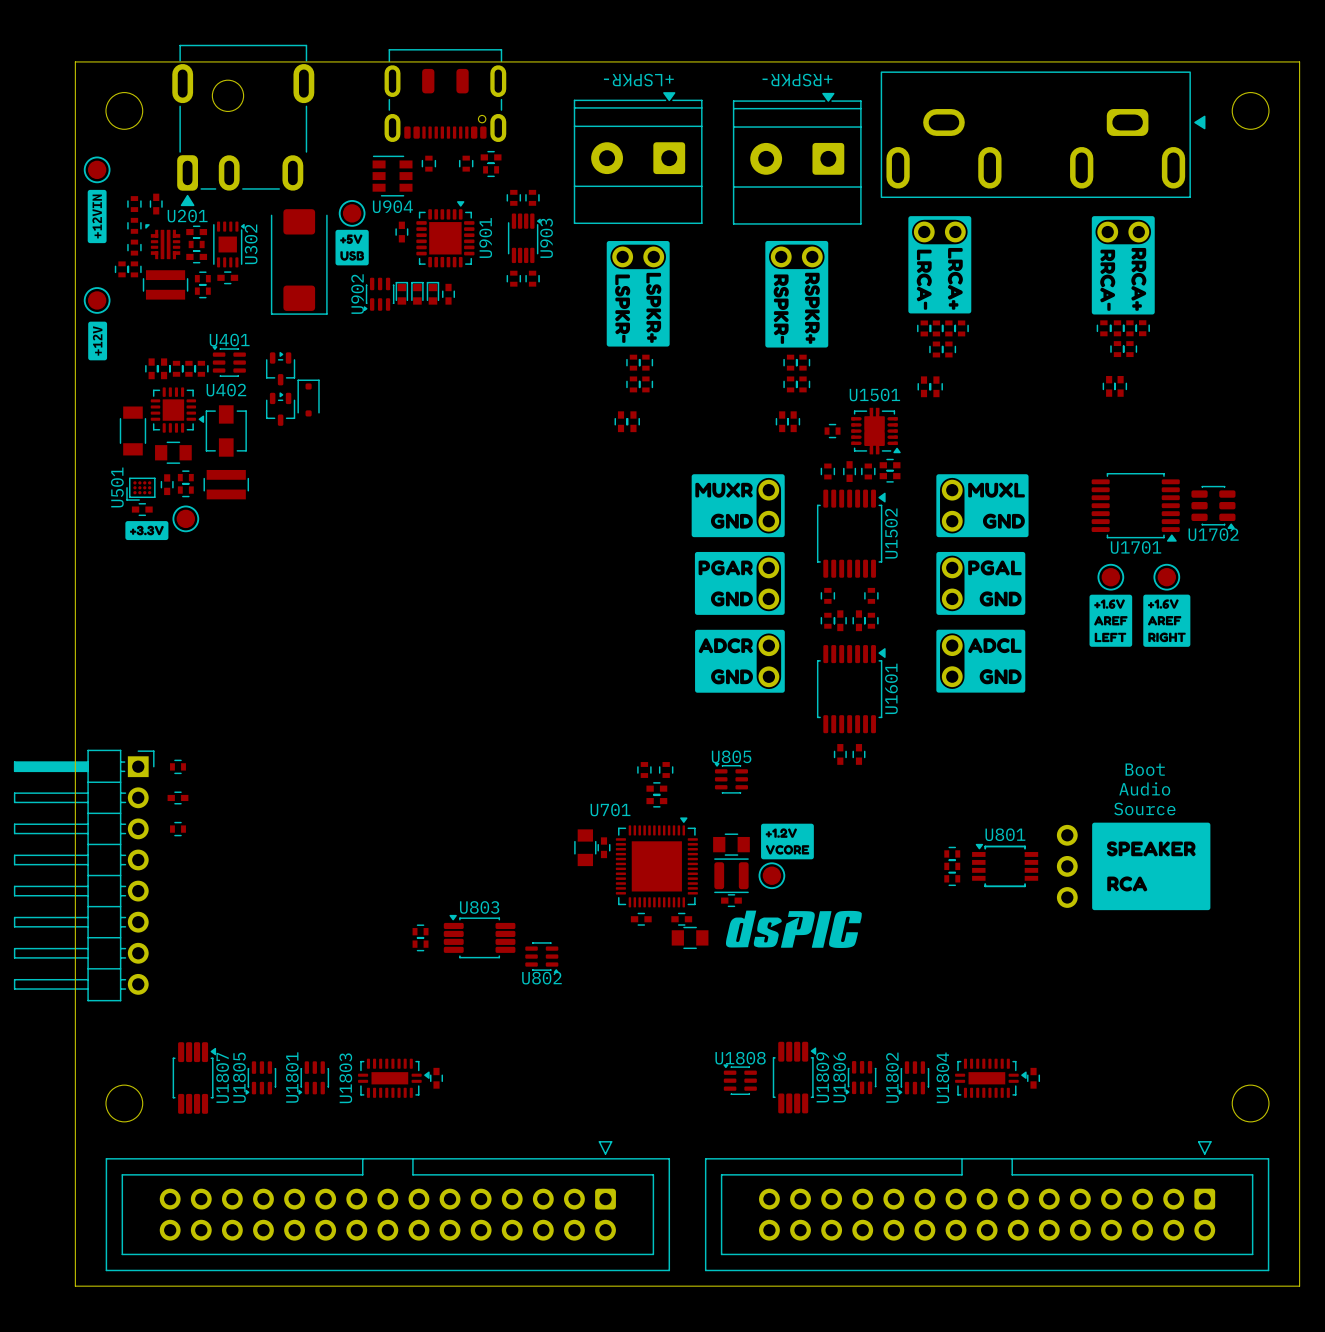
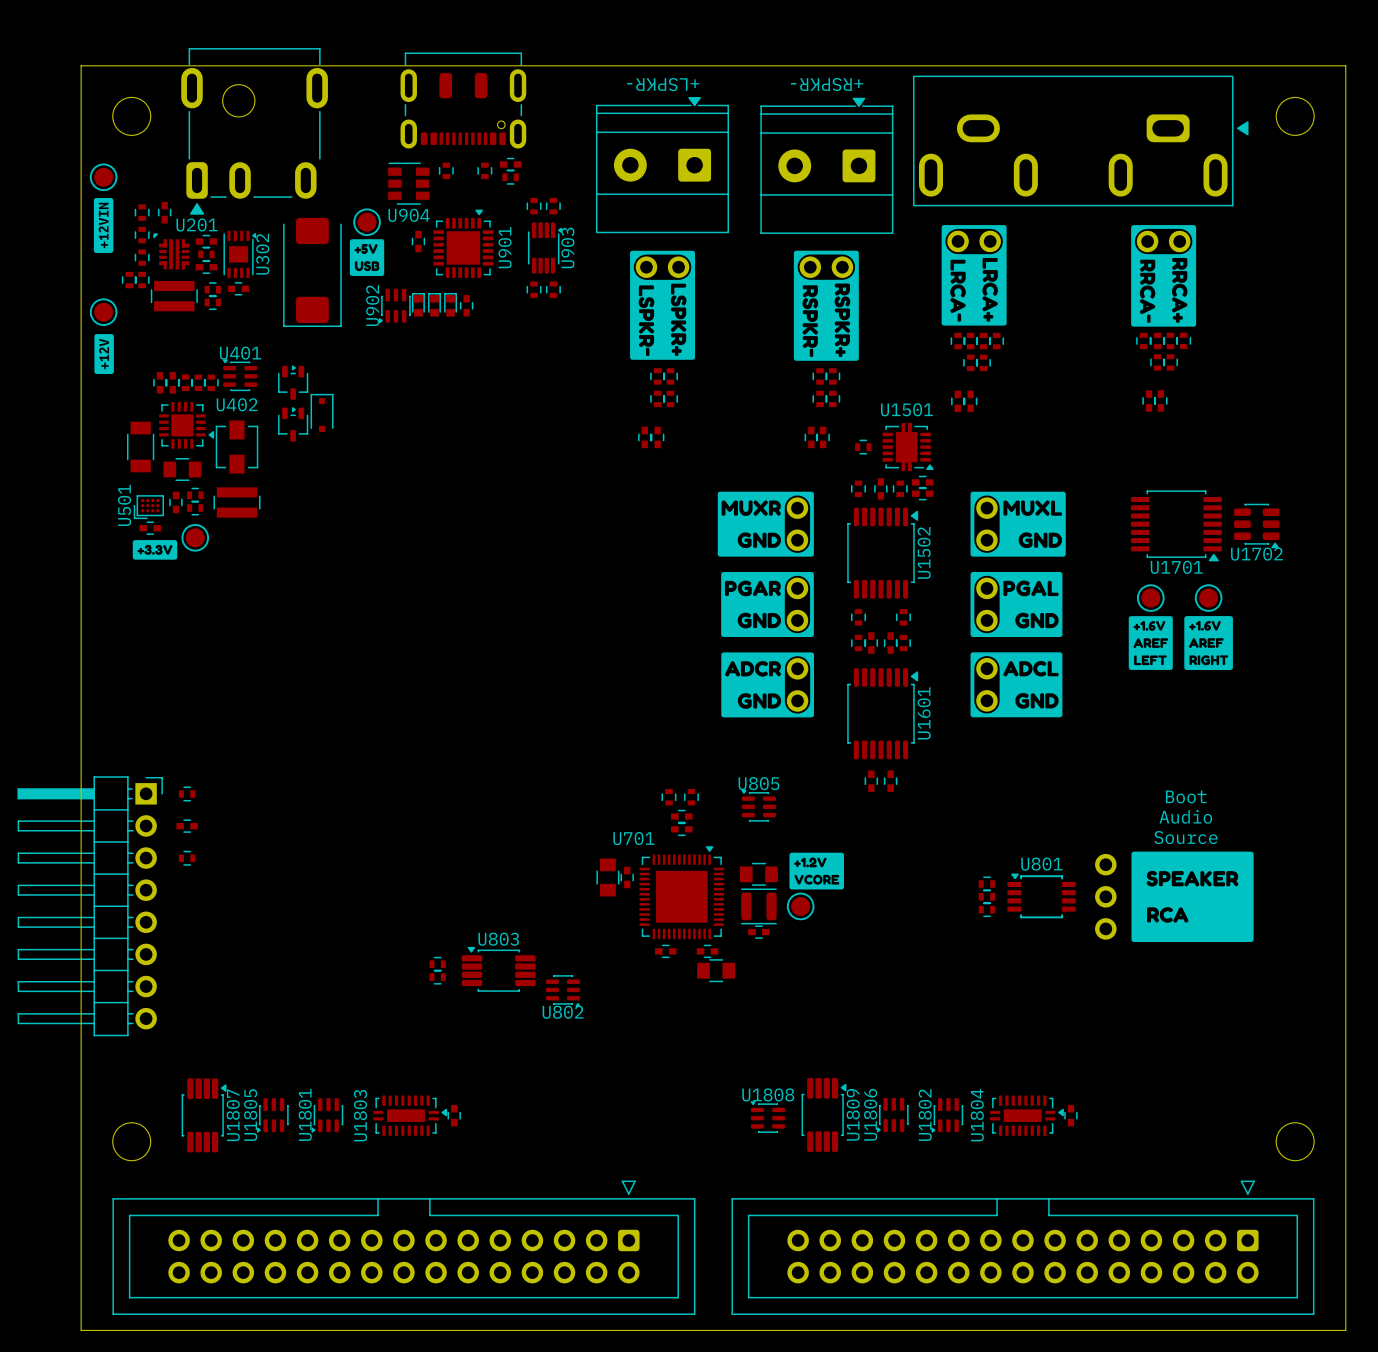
drawing: [725, 910, 862, 948] -> none

